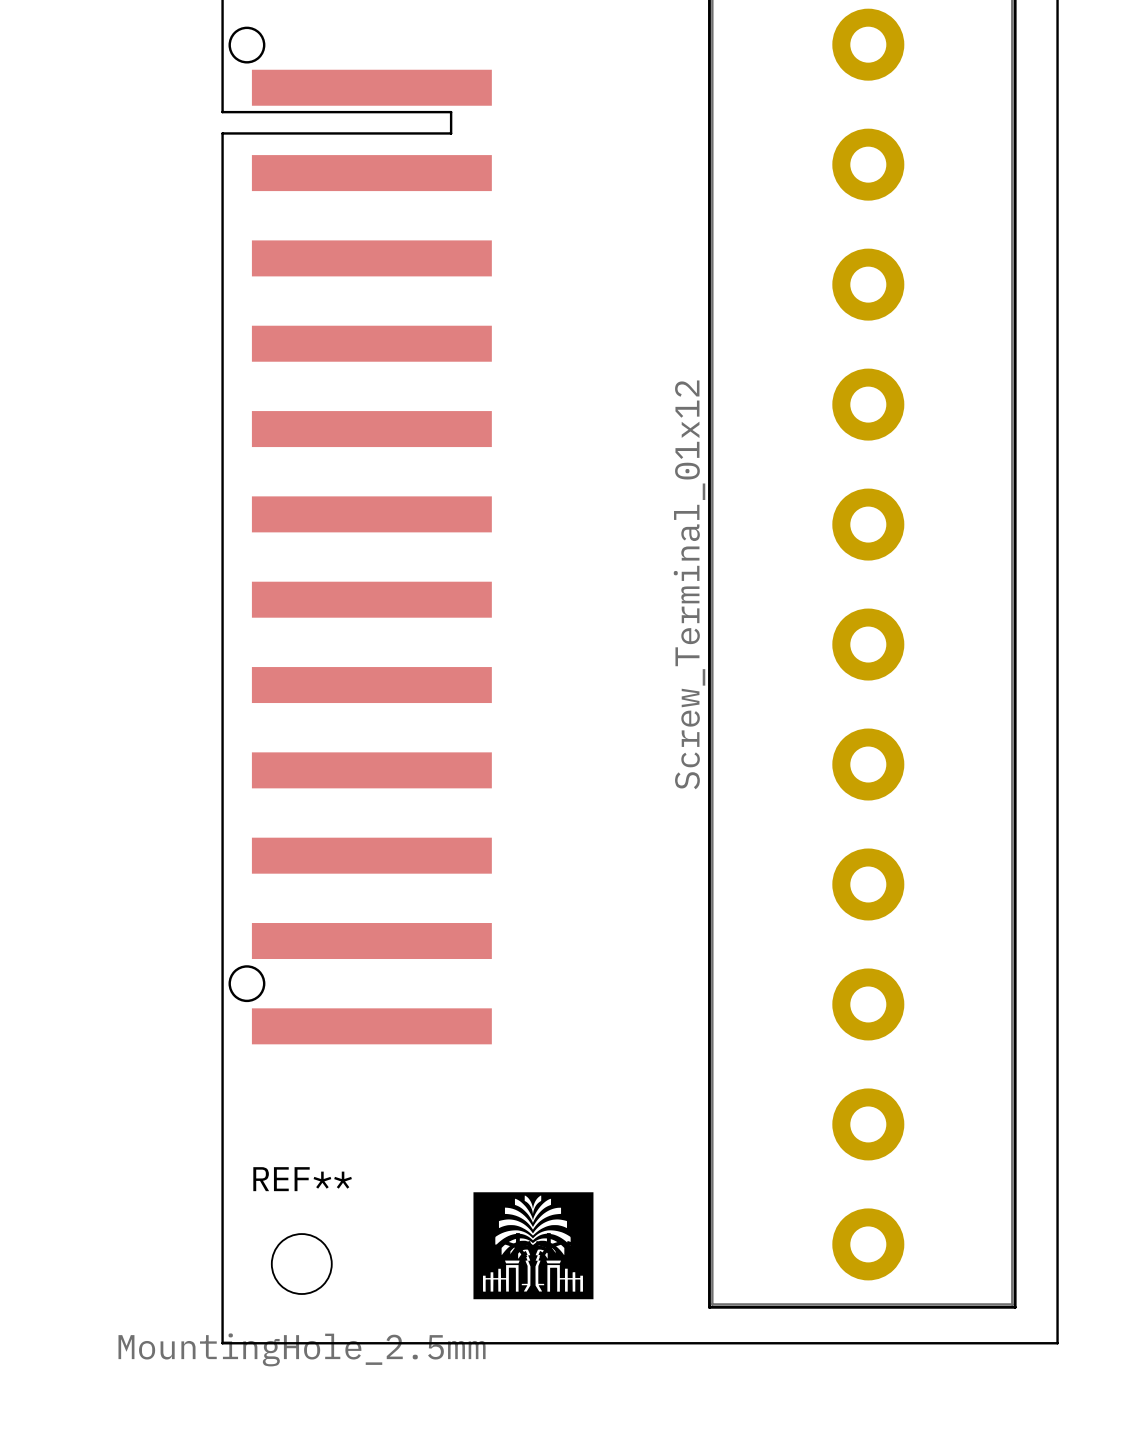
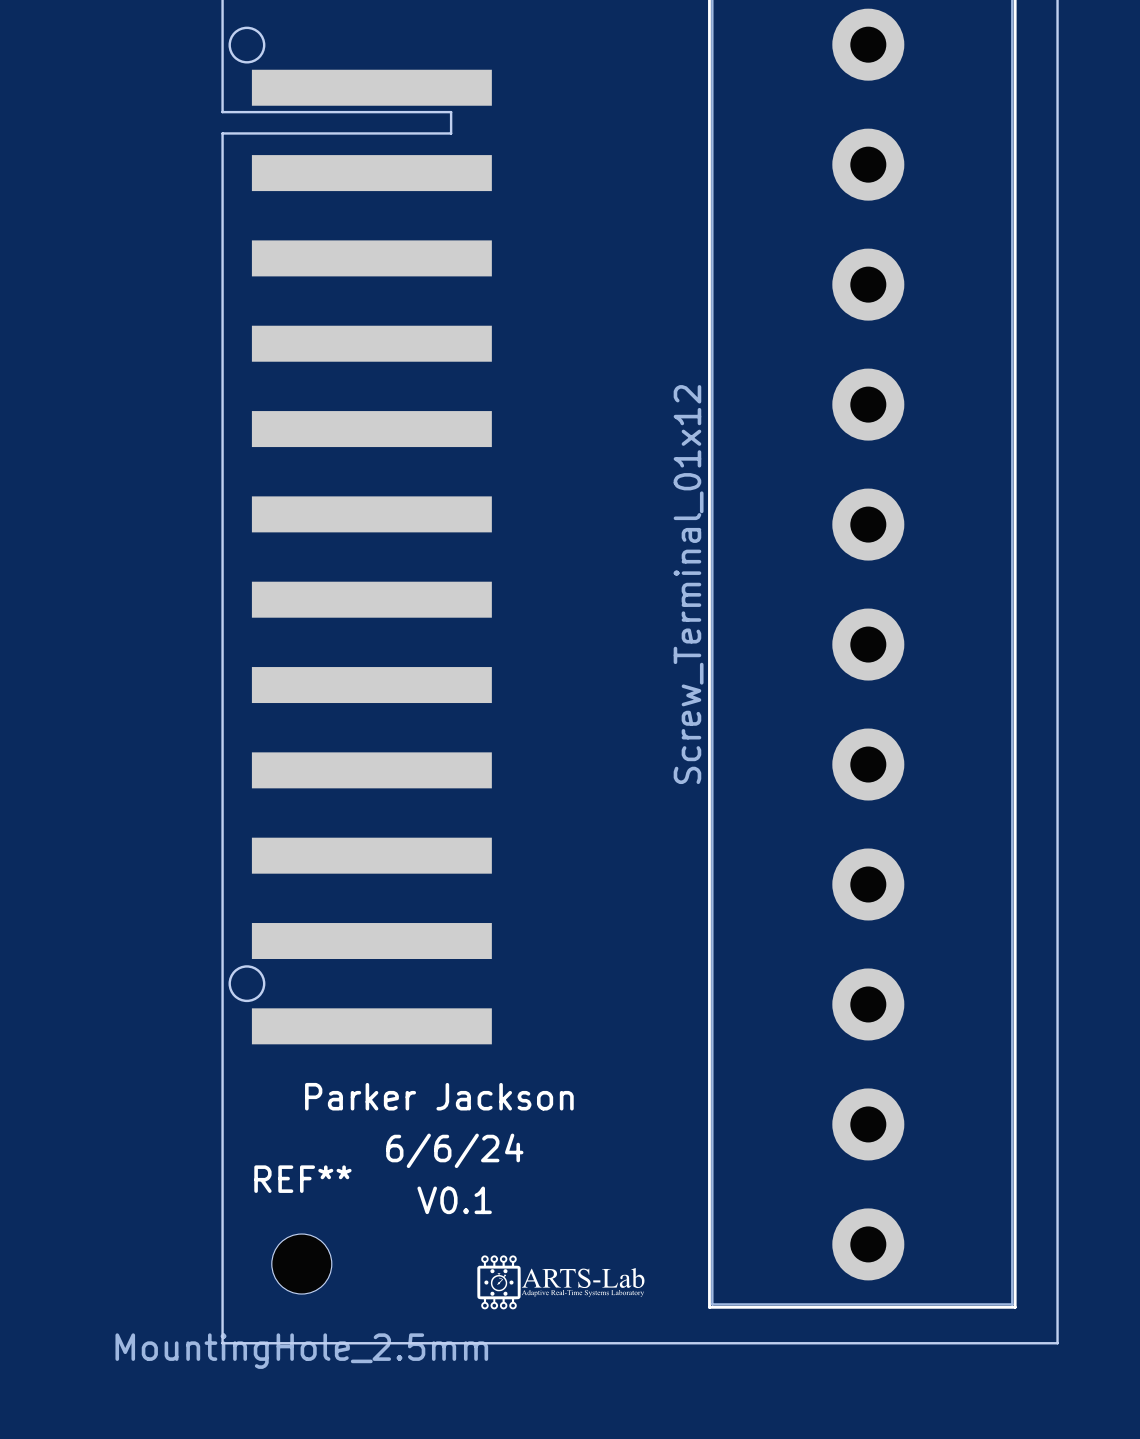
text: none -> Parker Jackson (439, 1096)
text: none -> 6/6/24 (454, 1150)
text: none -> V0.1 (454, 1200)
part: (533, 1245) -> none
drawing: none -> [477, 1255, 645, 1310]

